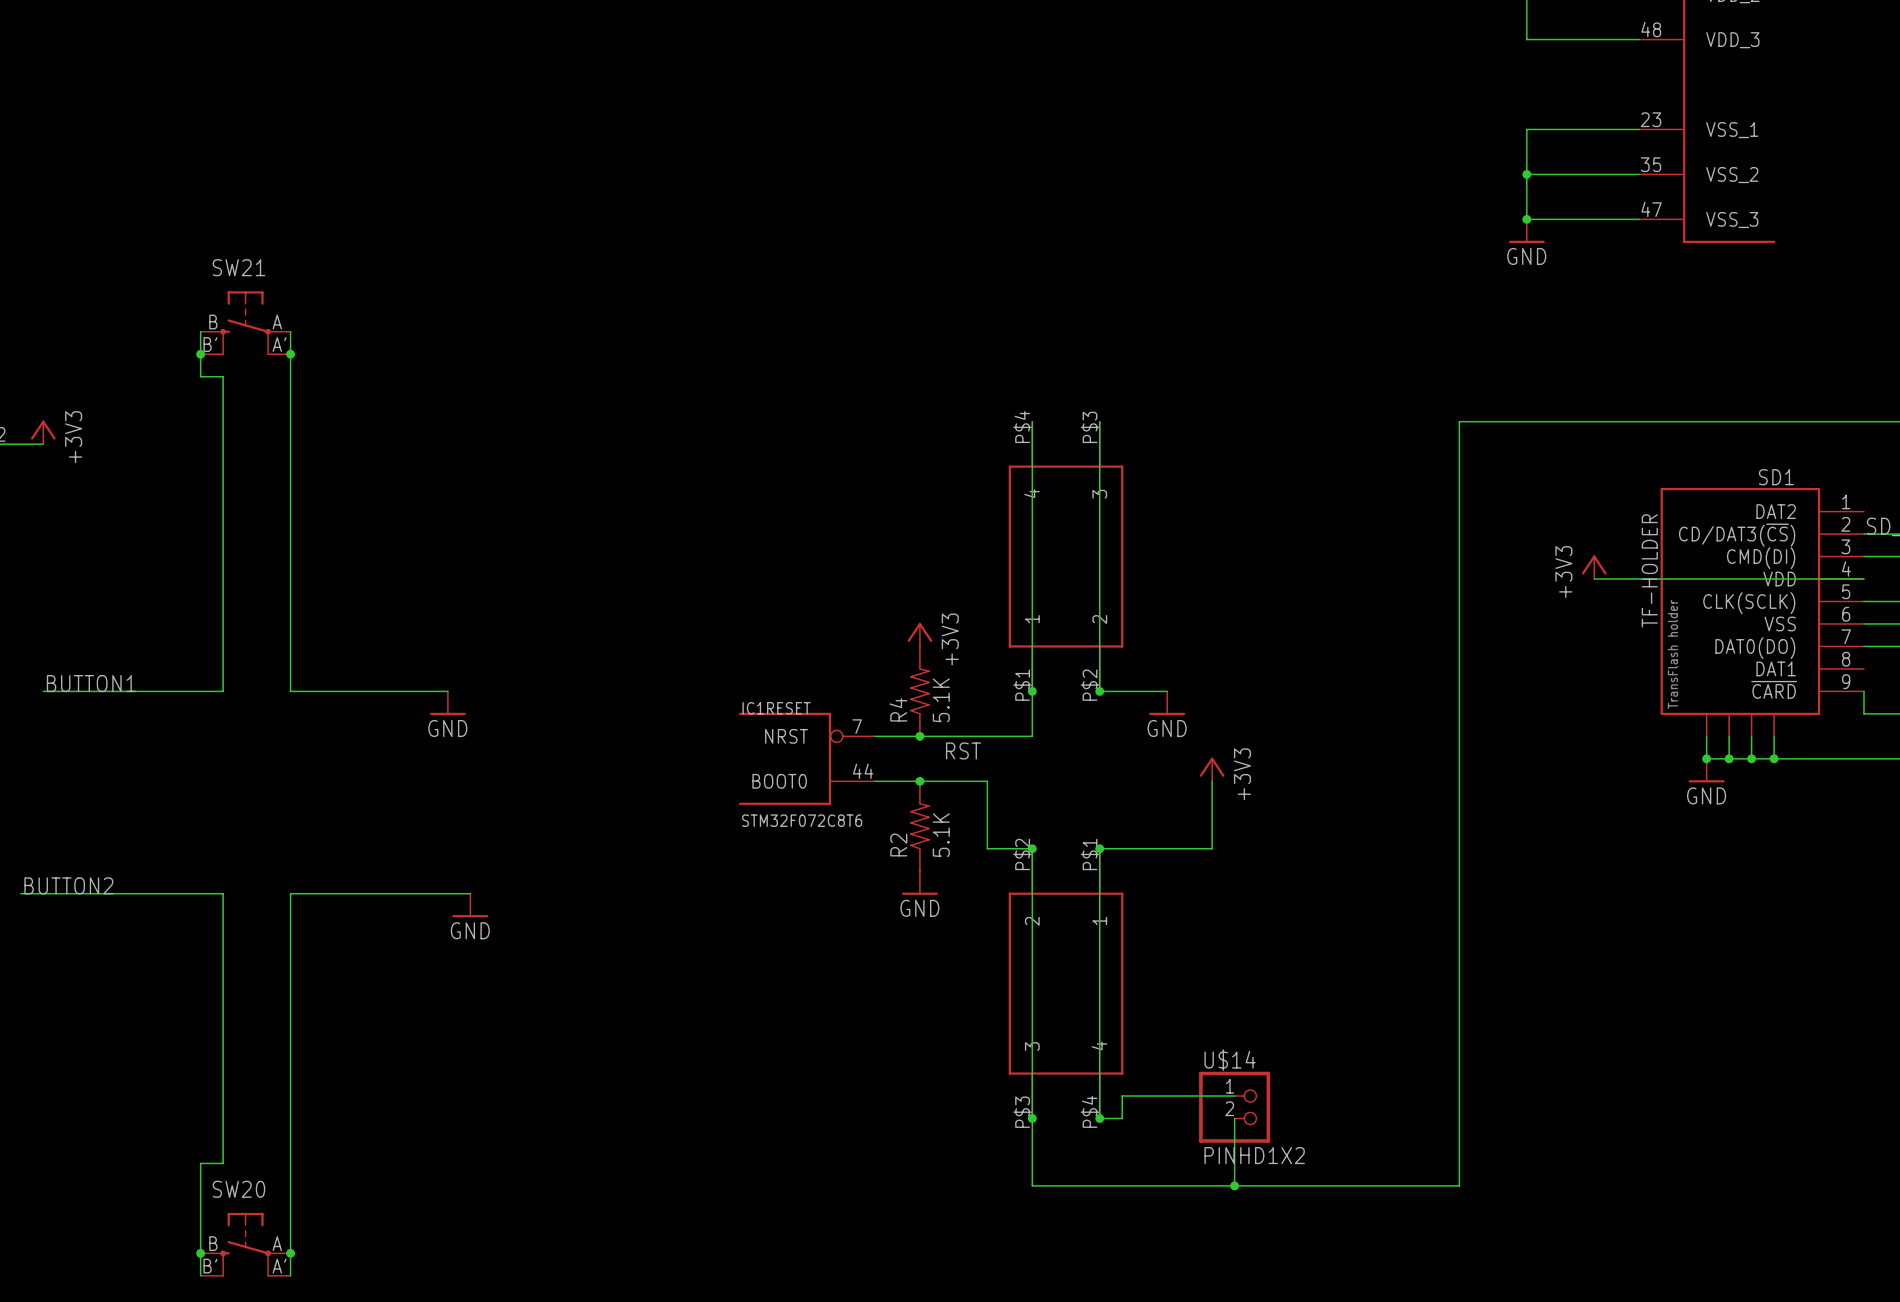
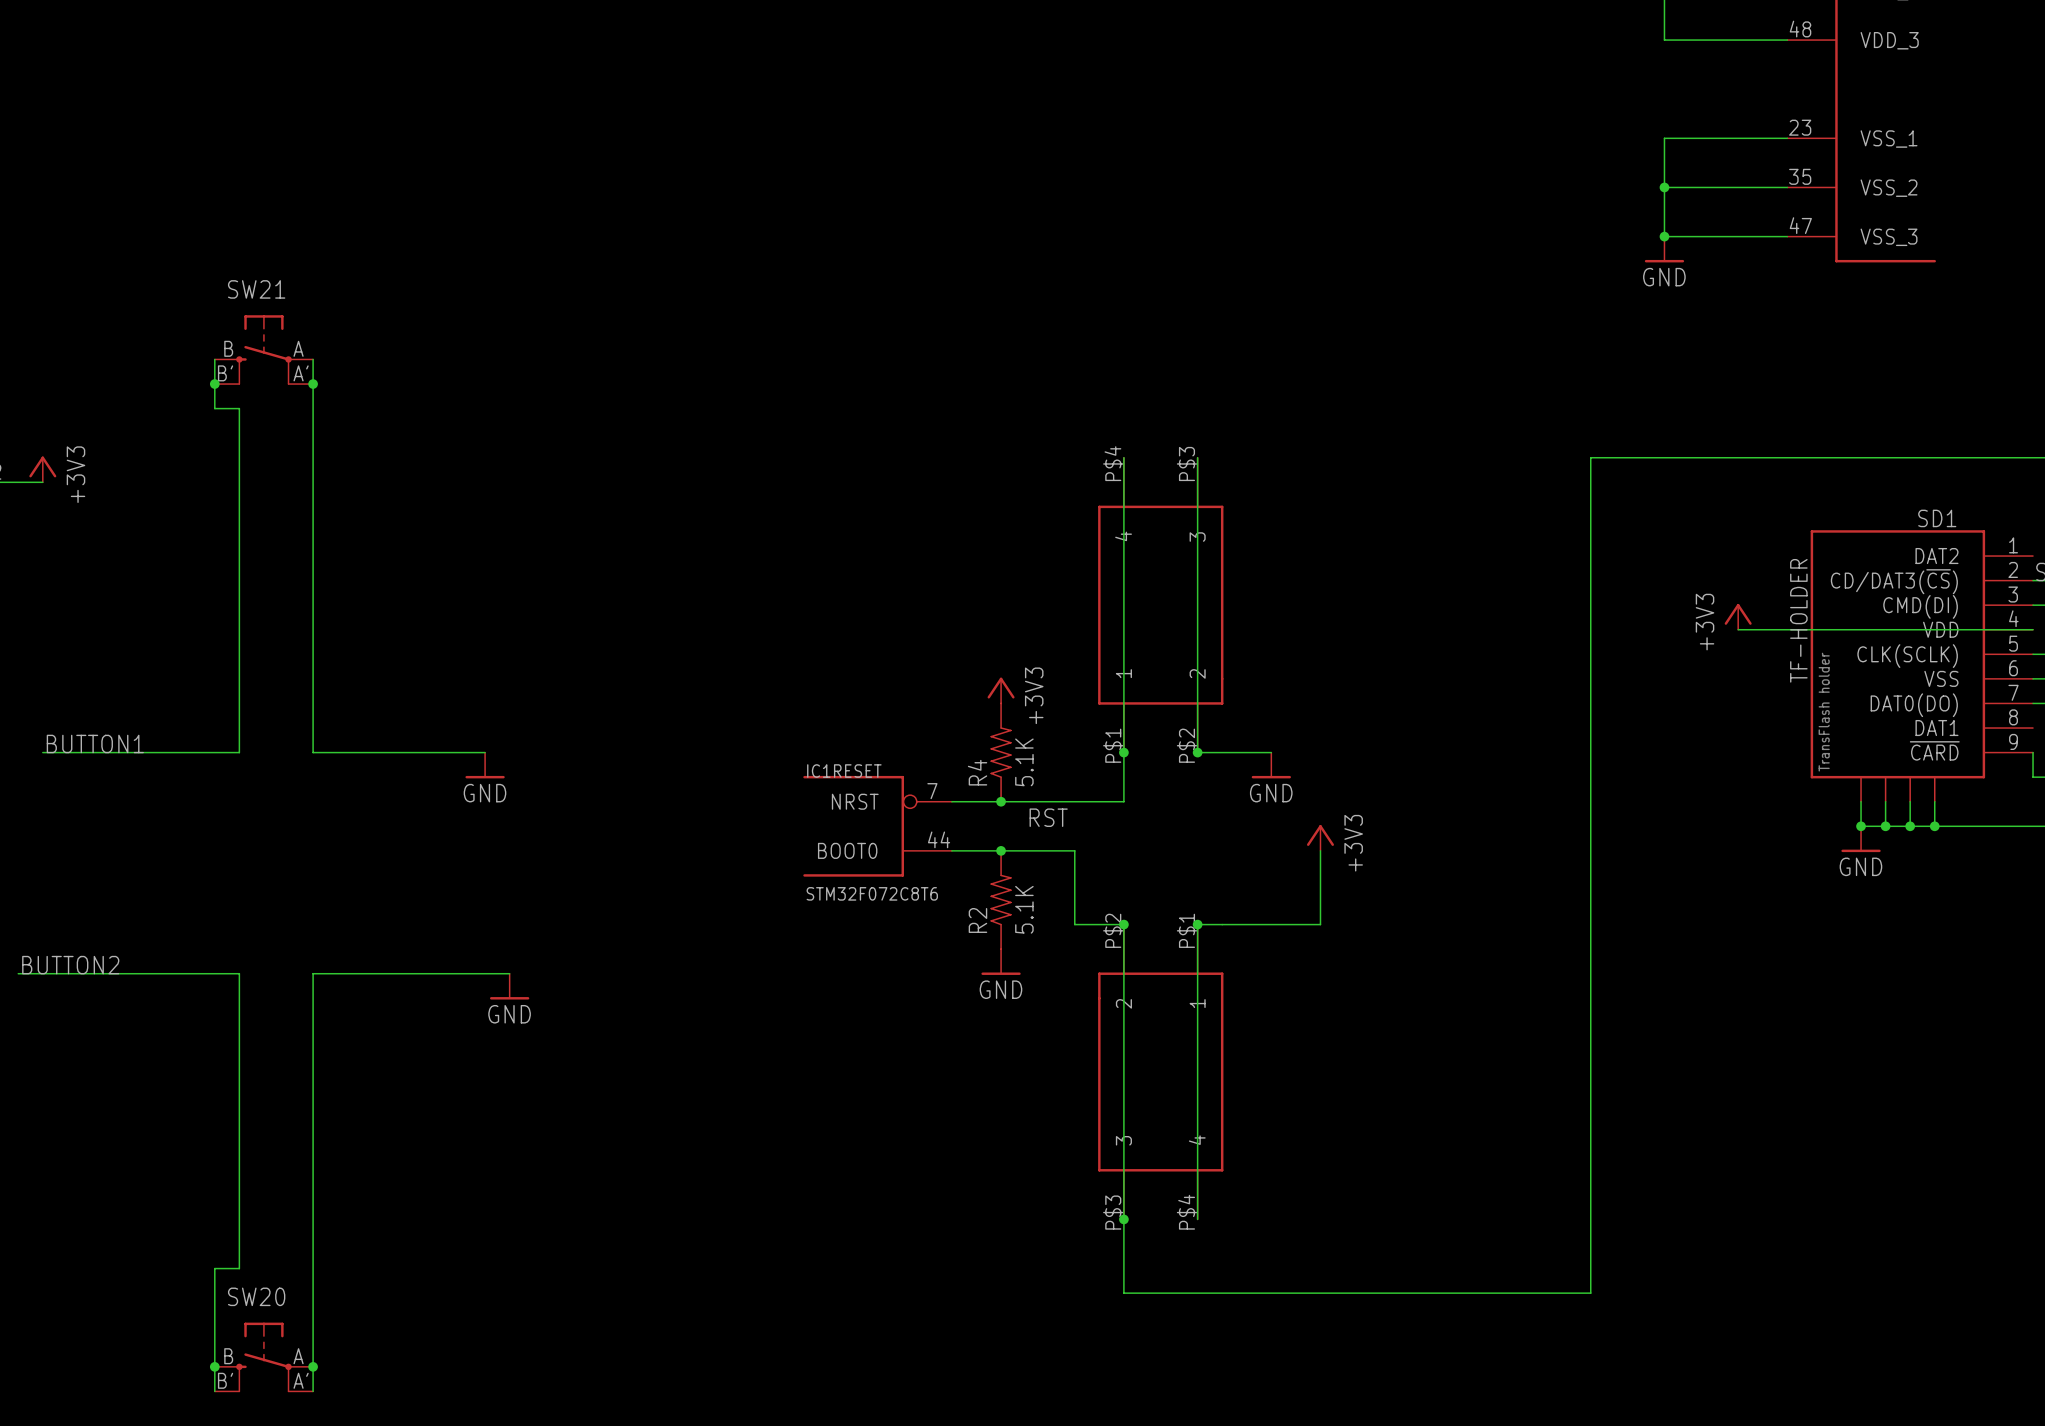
wire: (1234, 1096) (1122, 1096) (1122, 1118) (1099, 1118) -> none
U$14: PINHD1X2 (1234, 1107) -> none
junction: (1099, 1118) -> none
wire: (1234, 1118) (1234, 1185) -> none
junction: (1234, 1185) -> none

